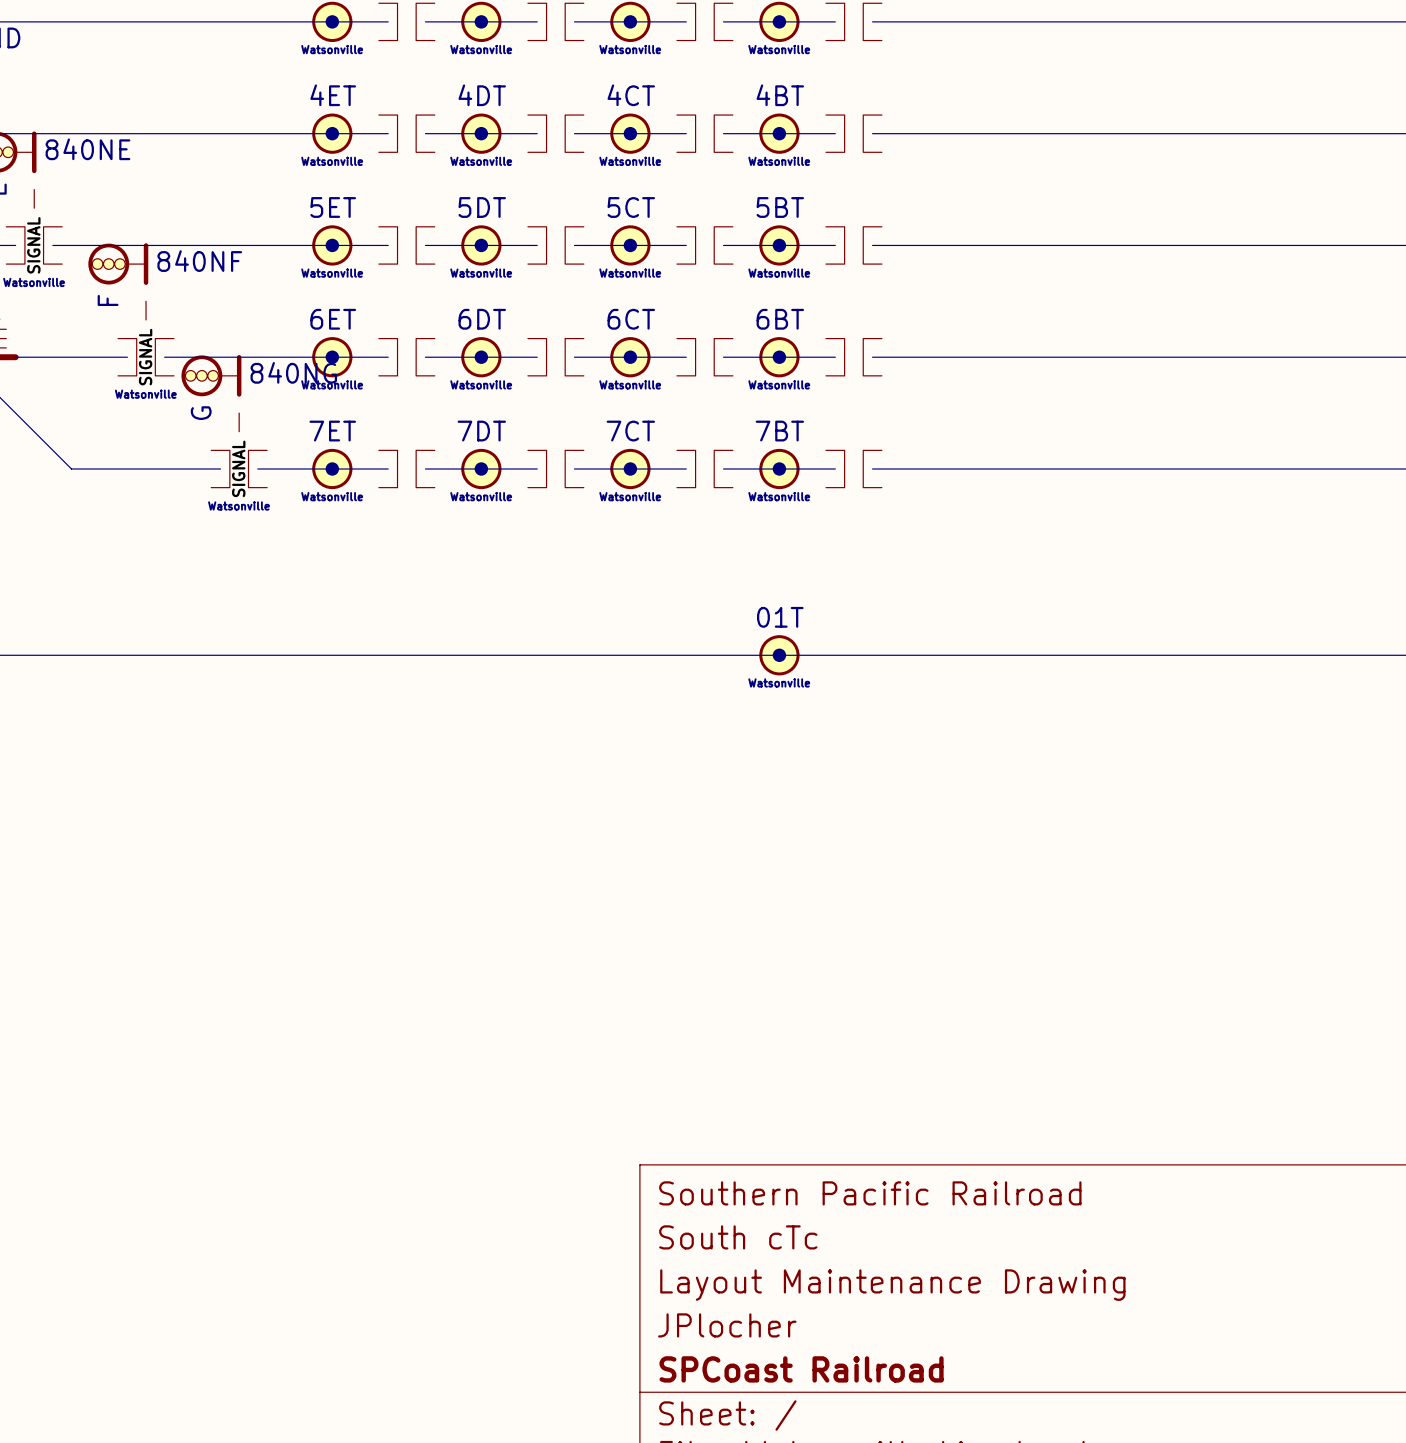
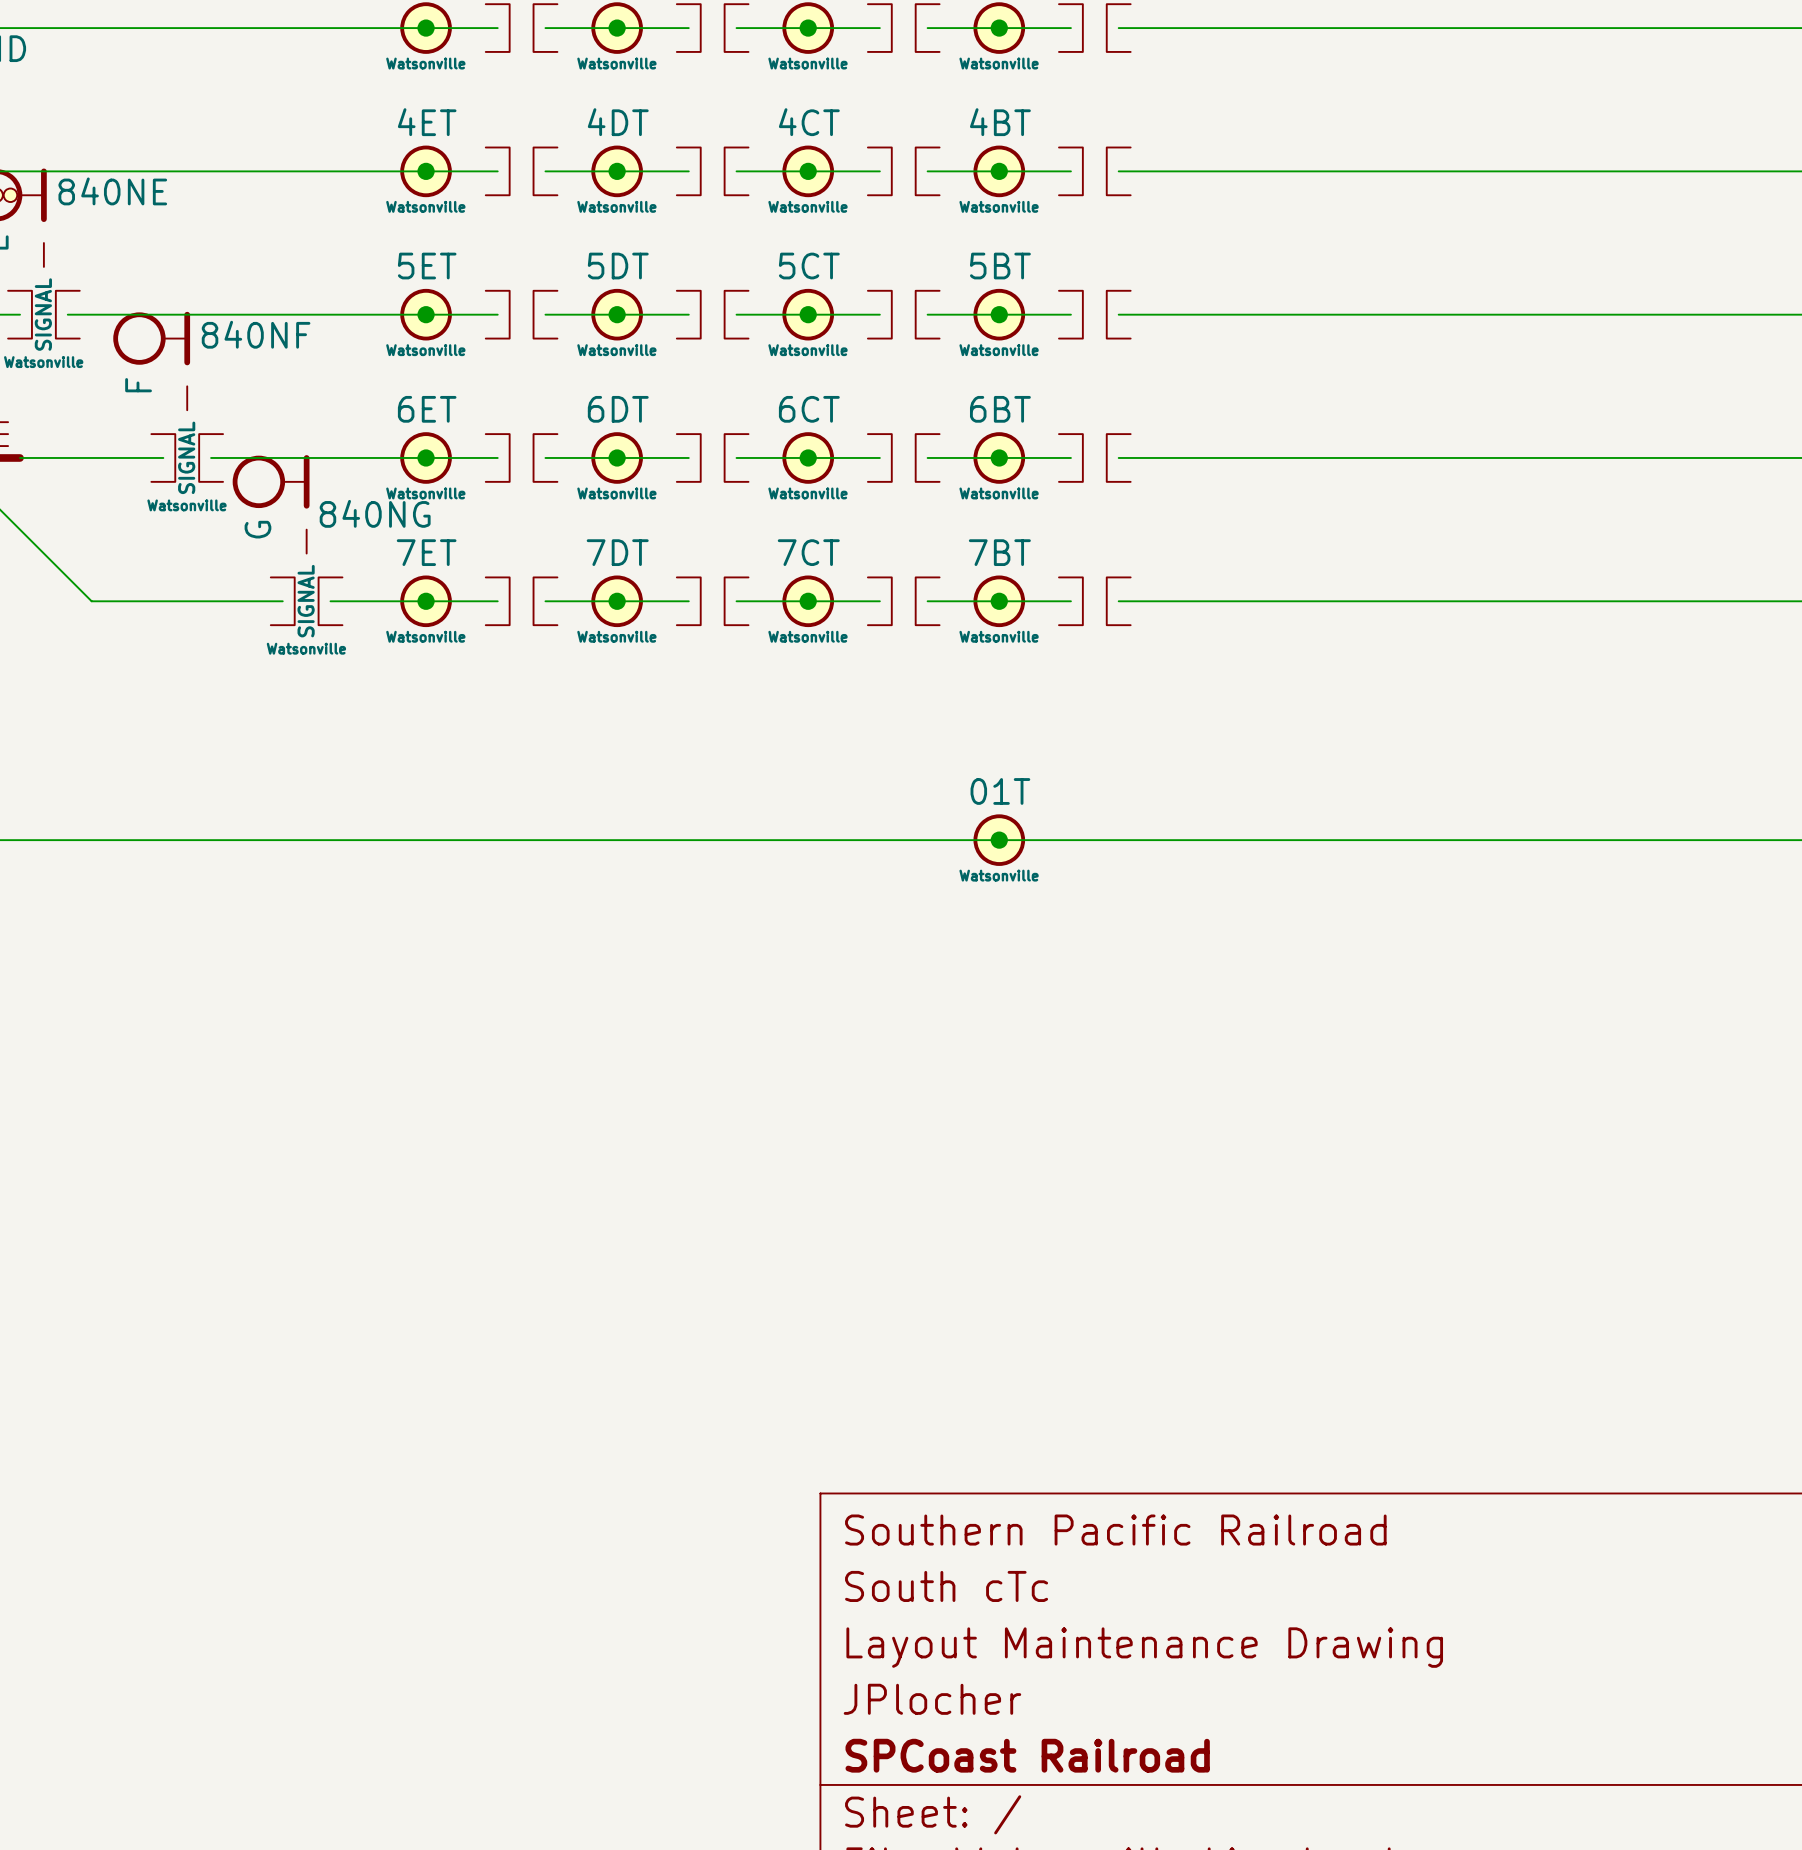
part symbol: [88, 243, 130, 285] -> [113, 312, 166, 365]
part symbol: [181, 355, 223, 397] -> [232, 455, 286, 509]
part value position: 840NG (293, 372) -> 840NG (375, 513)

